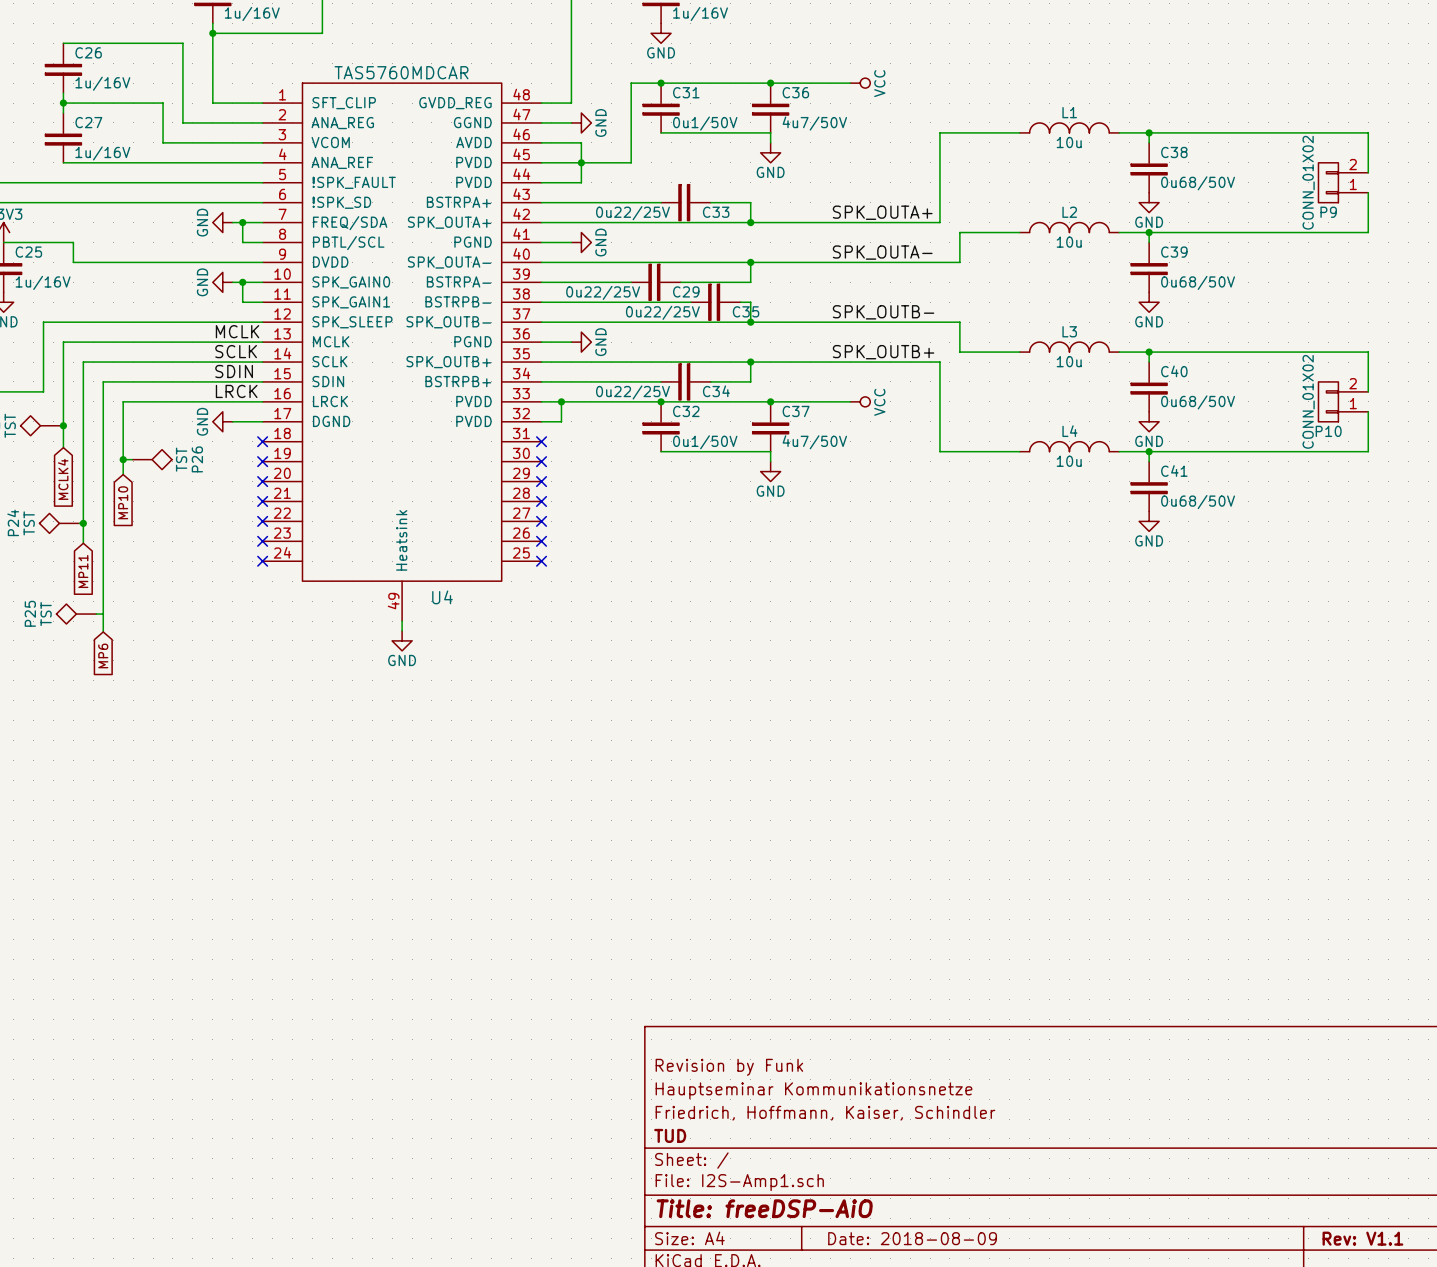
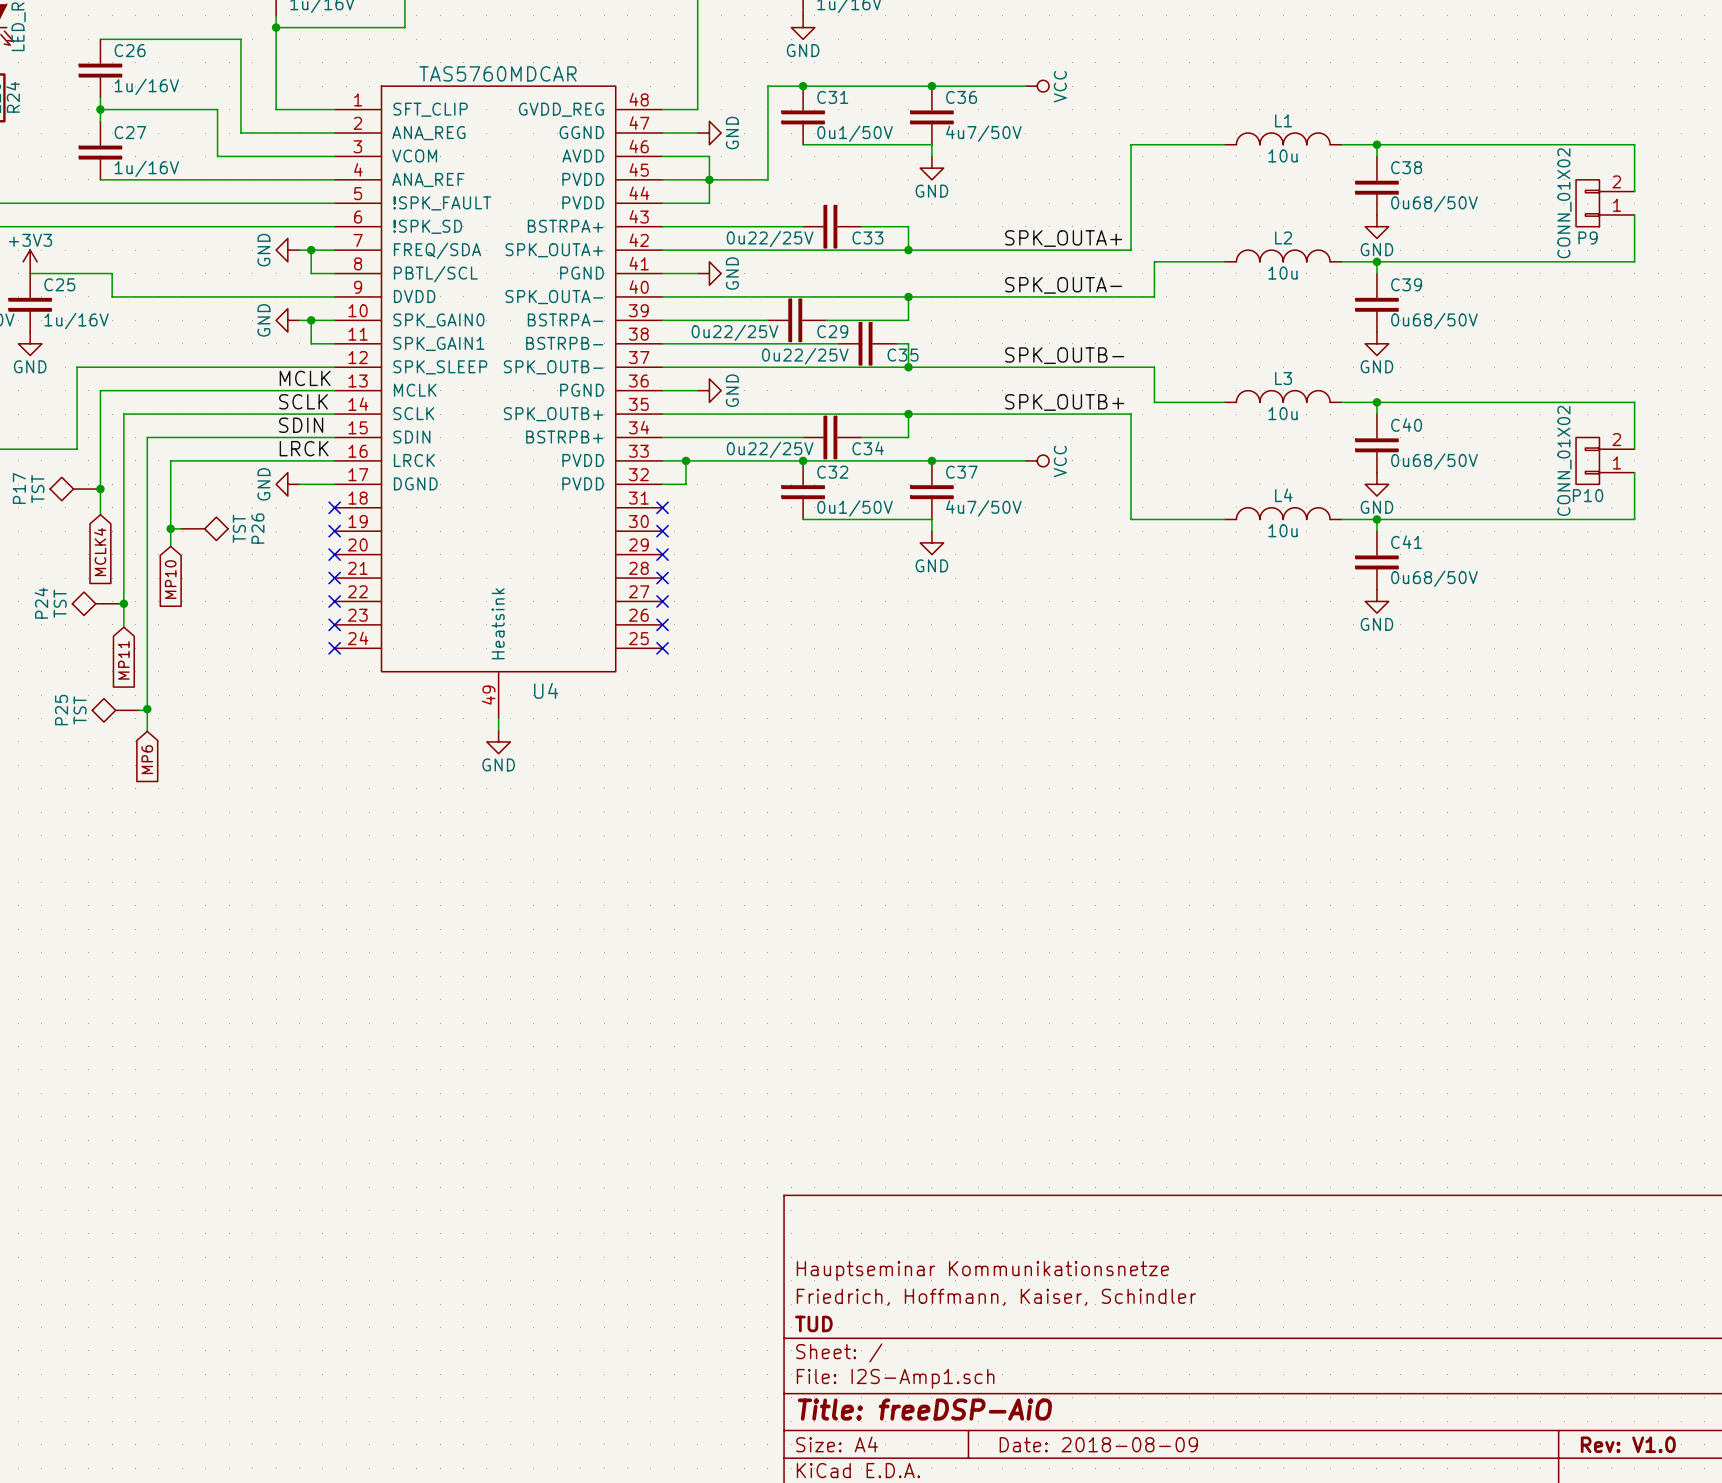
junction: none -> (147, 709)
title block: Revision by Funk (729, 1067) -> none
title block: Rev: V1.1 (1362, 1238) -> Rev: V1.0 (1628, 1444)

